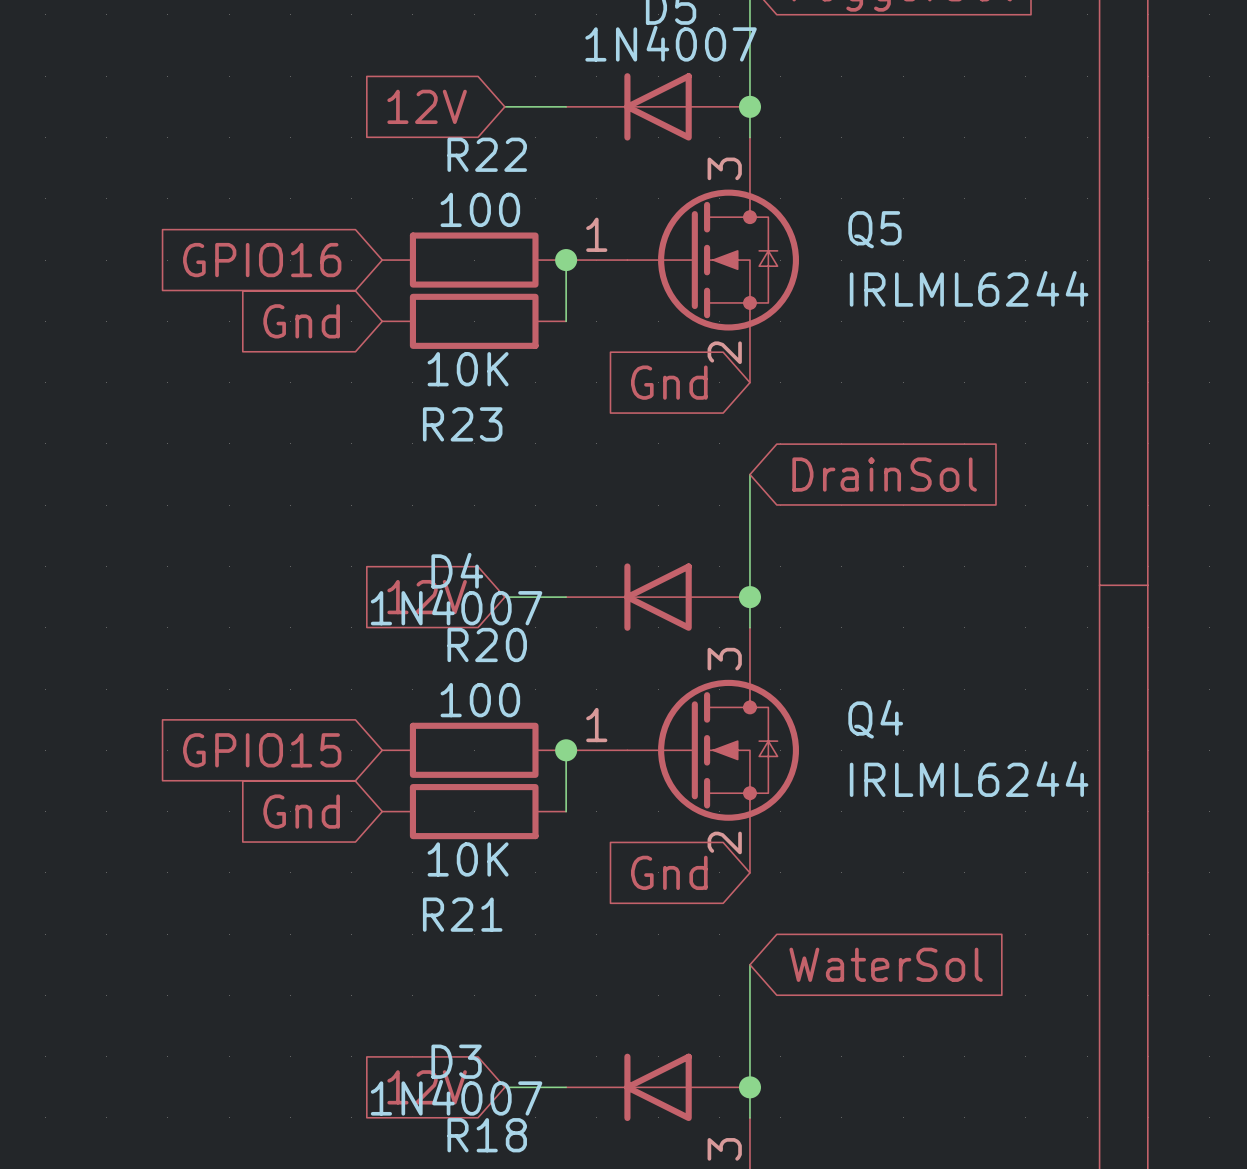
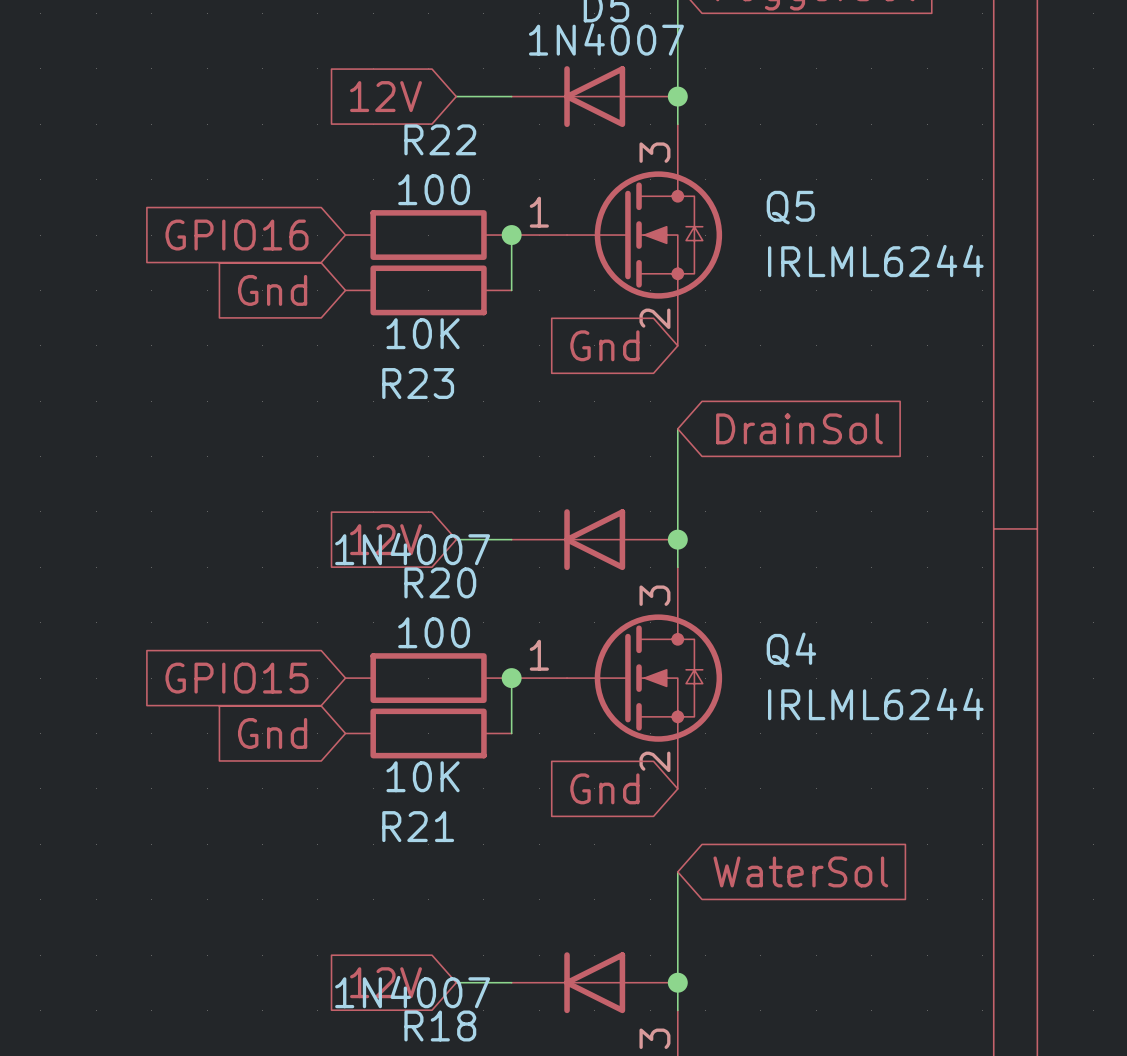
D4 name: D4 (457, 570) -> none
D3 name: D3 (456, 1061) -> none

